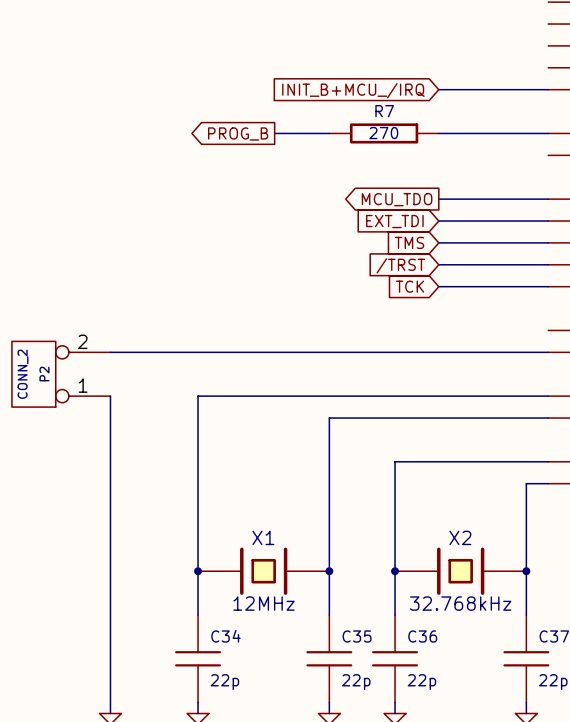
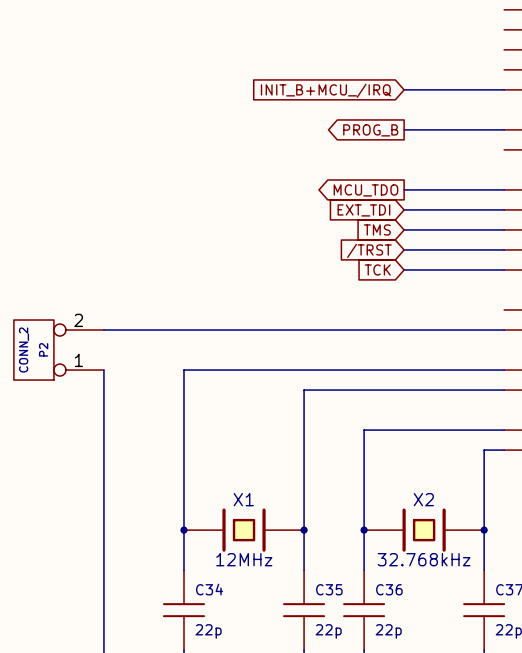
global label position: PROG_B (238, 133) -> PROG_B (370, 130)
wire: (274, 133) (329, 133) -> none
R7: 270 (384, 133) -> none

